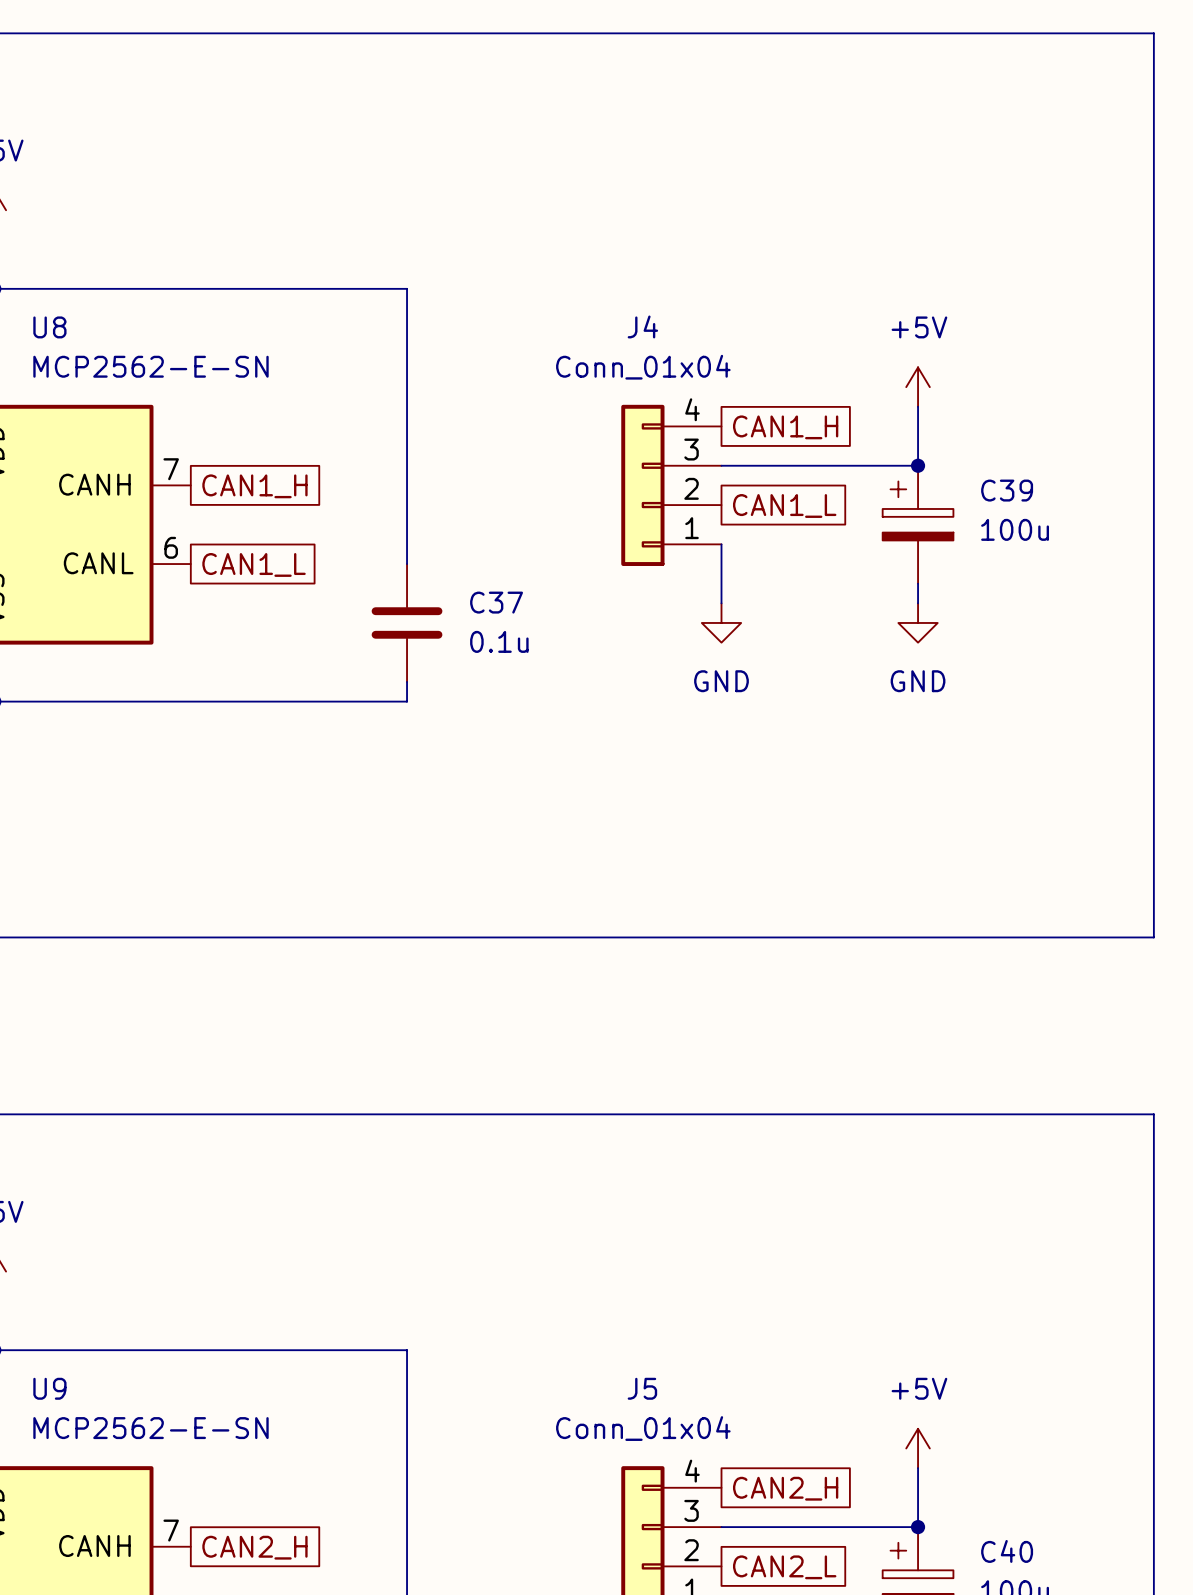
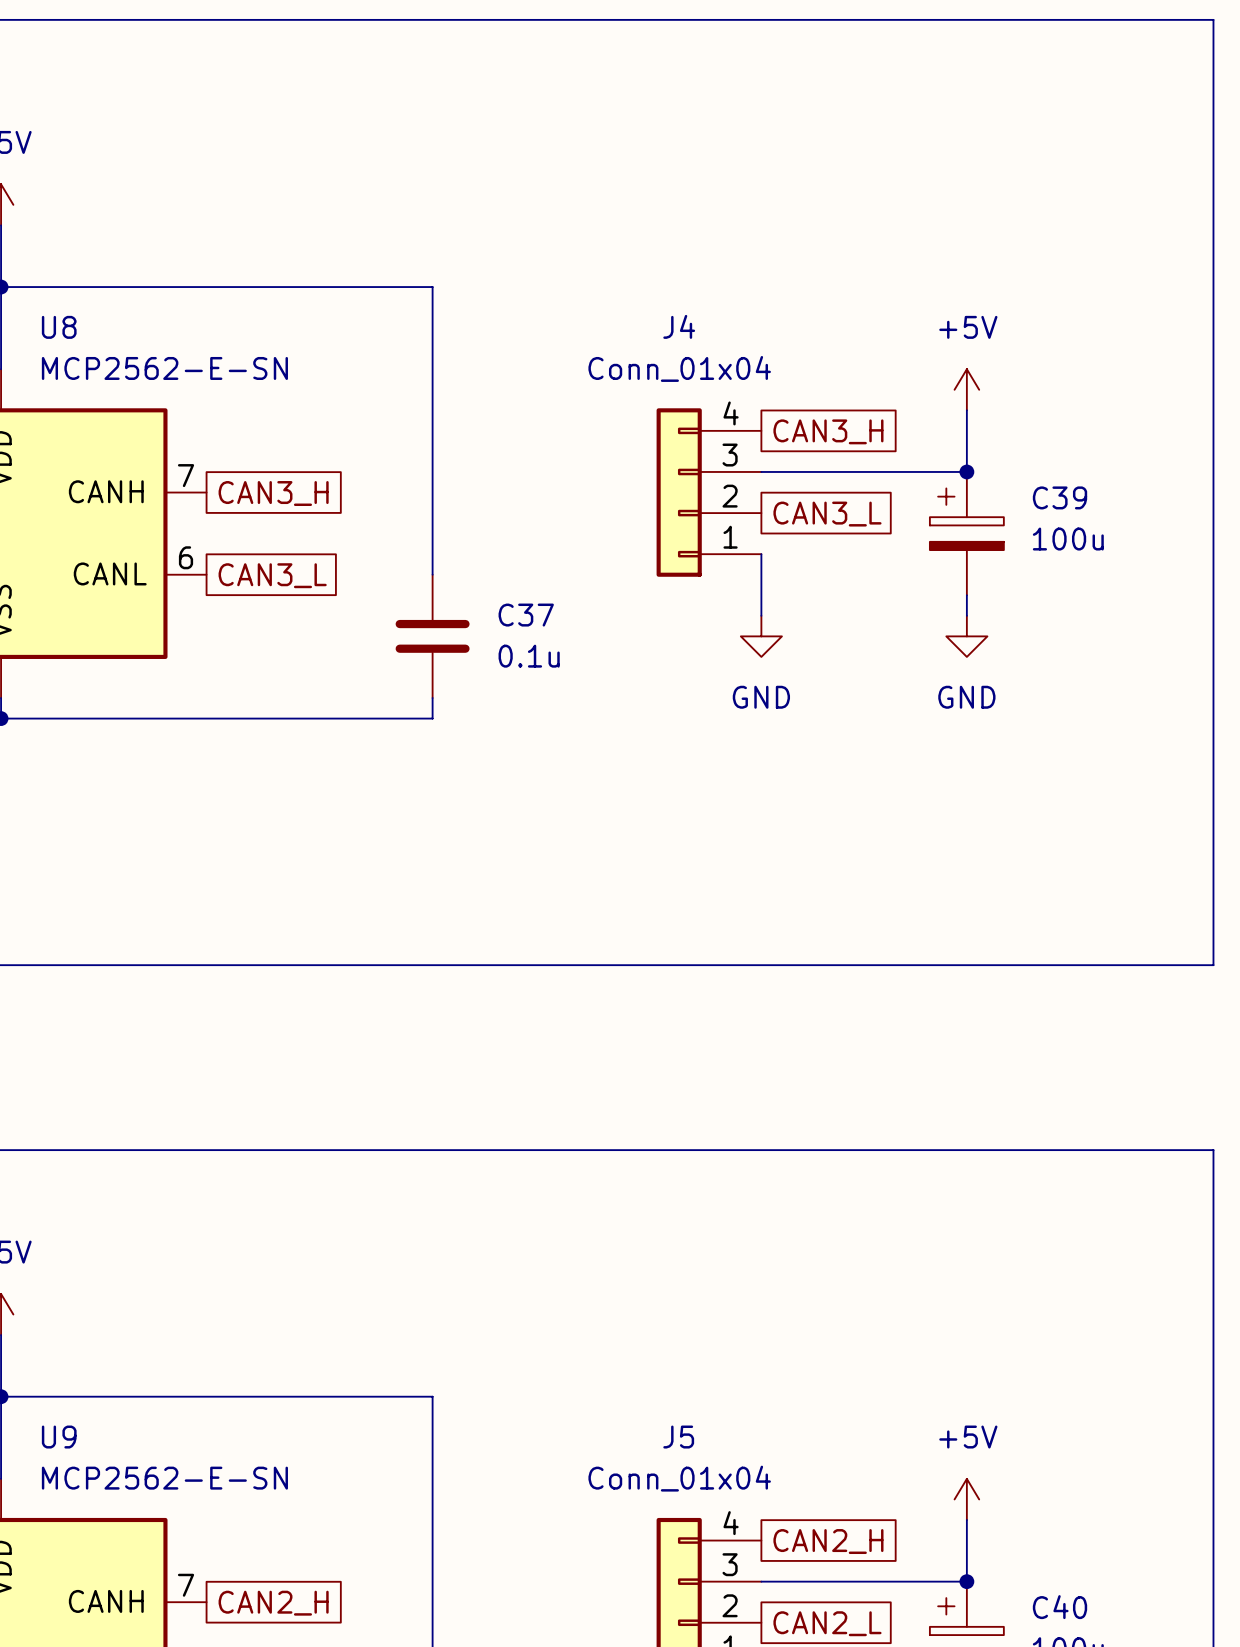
global label: CAN1_H (785, 427) -> CAN3_H (828, 431)
global label: CAN1_H (254, 486) -> CAN3_H (273, 493)
global label: CAN1_L (784, 505) -> CAN3_L (827, 514)
global label: CAN1_L (254, 564) -> CAN3_L (272, 575)

